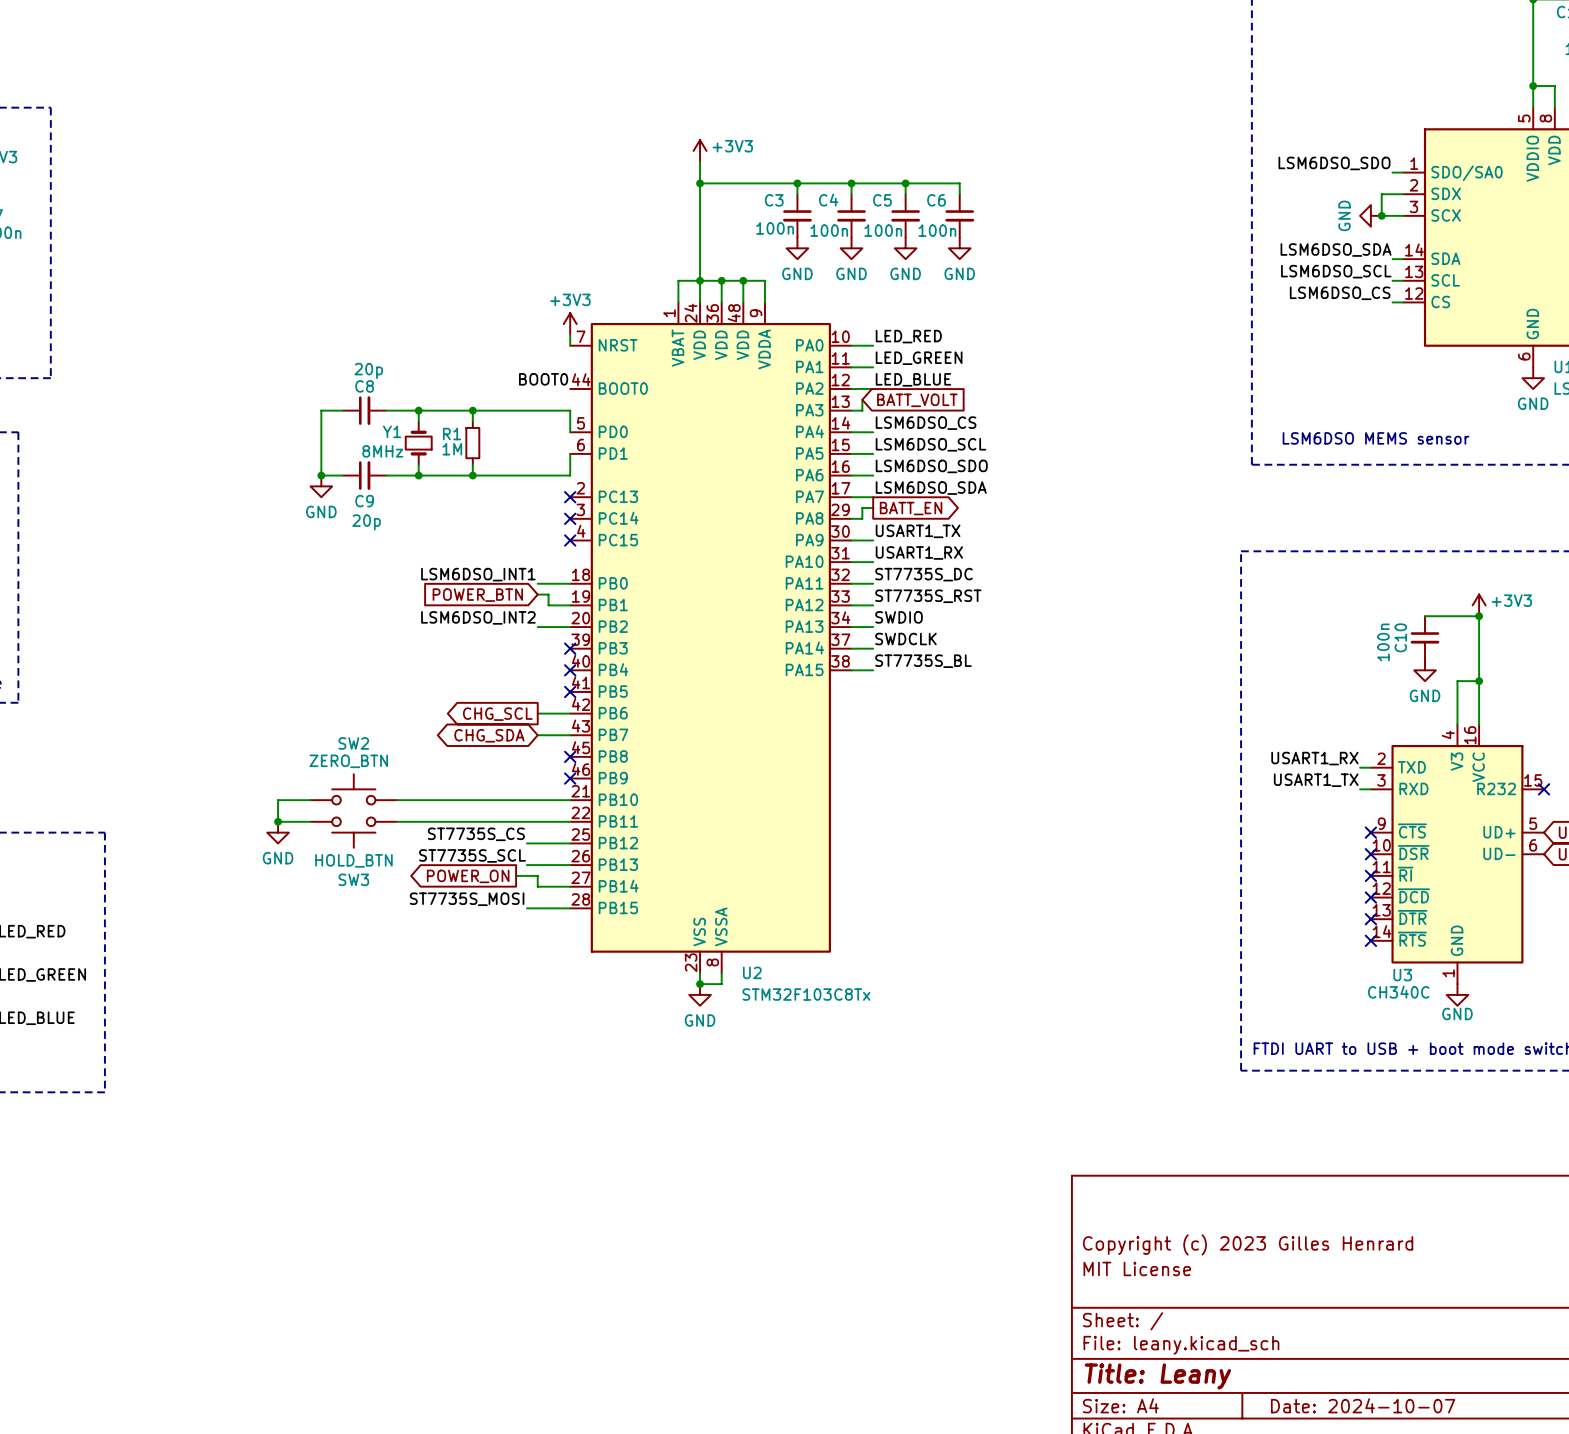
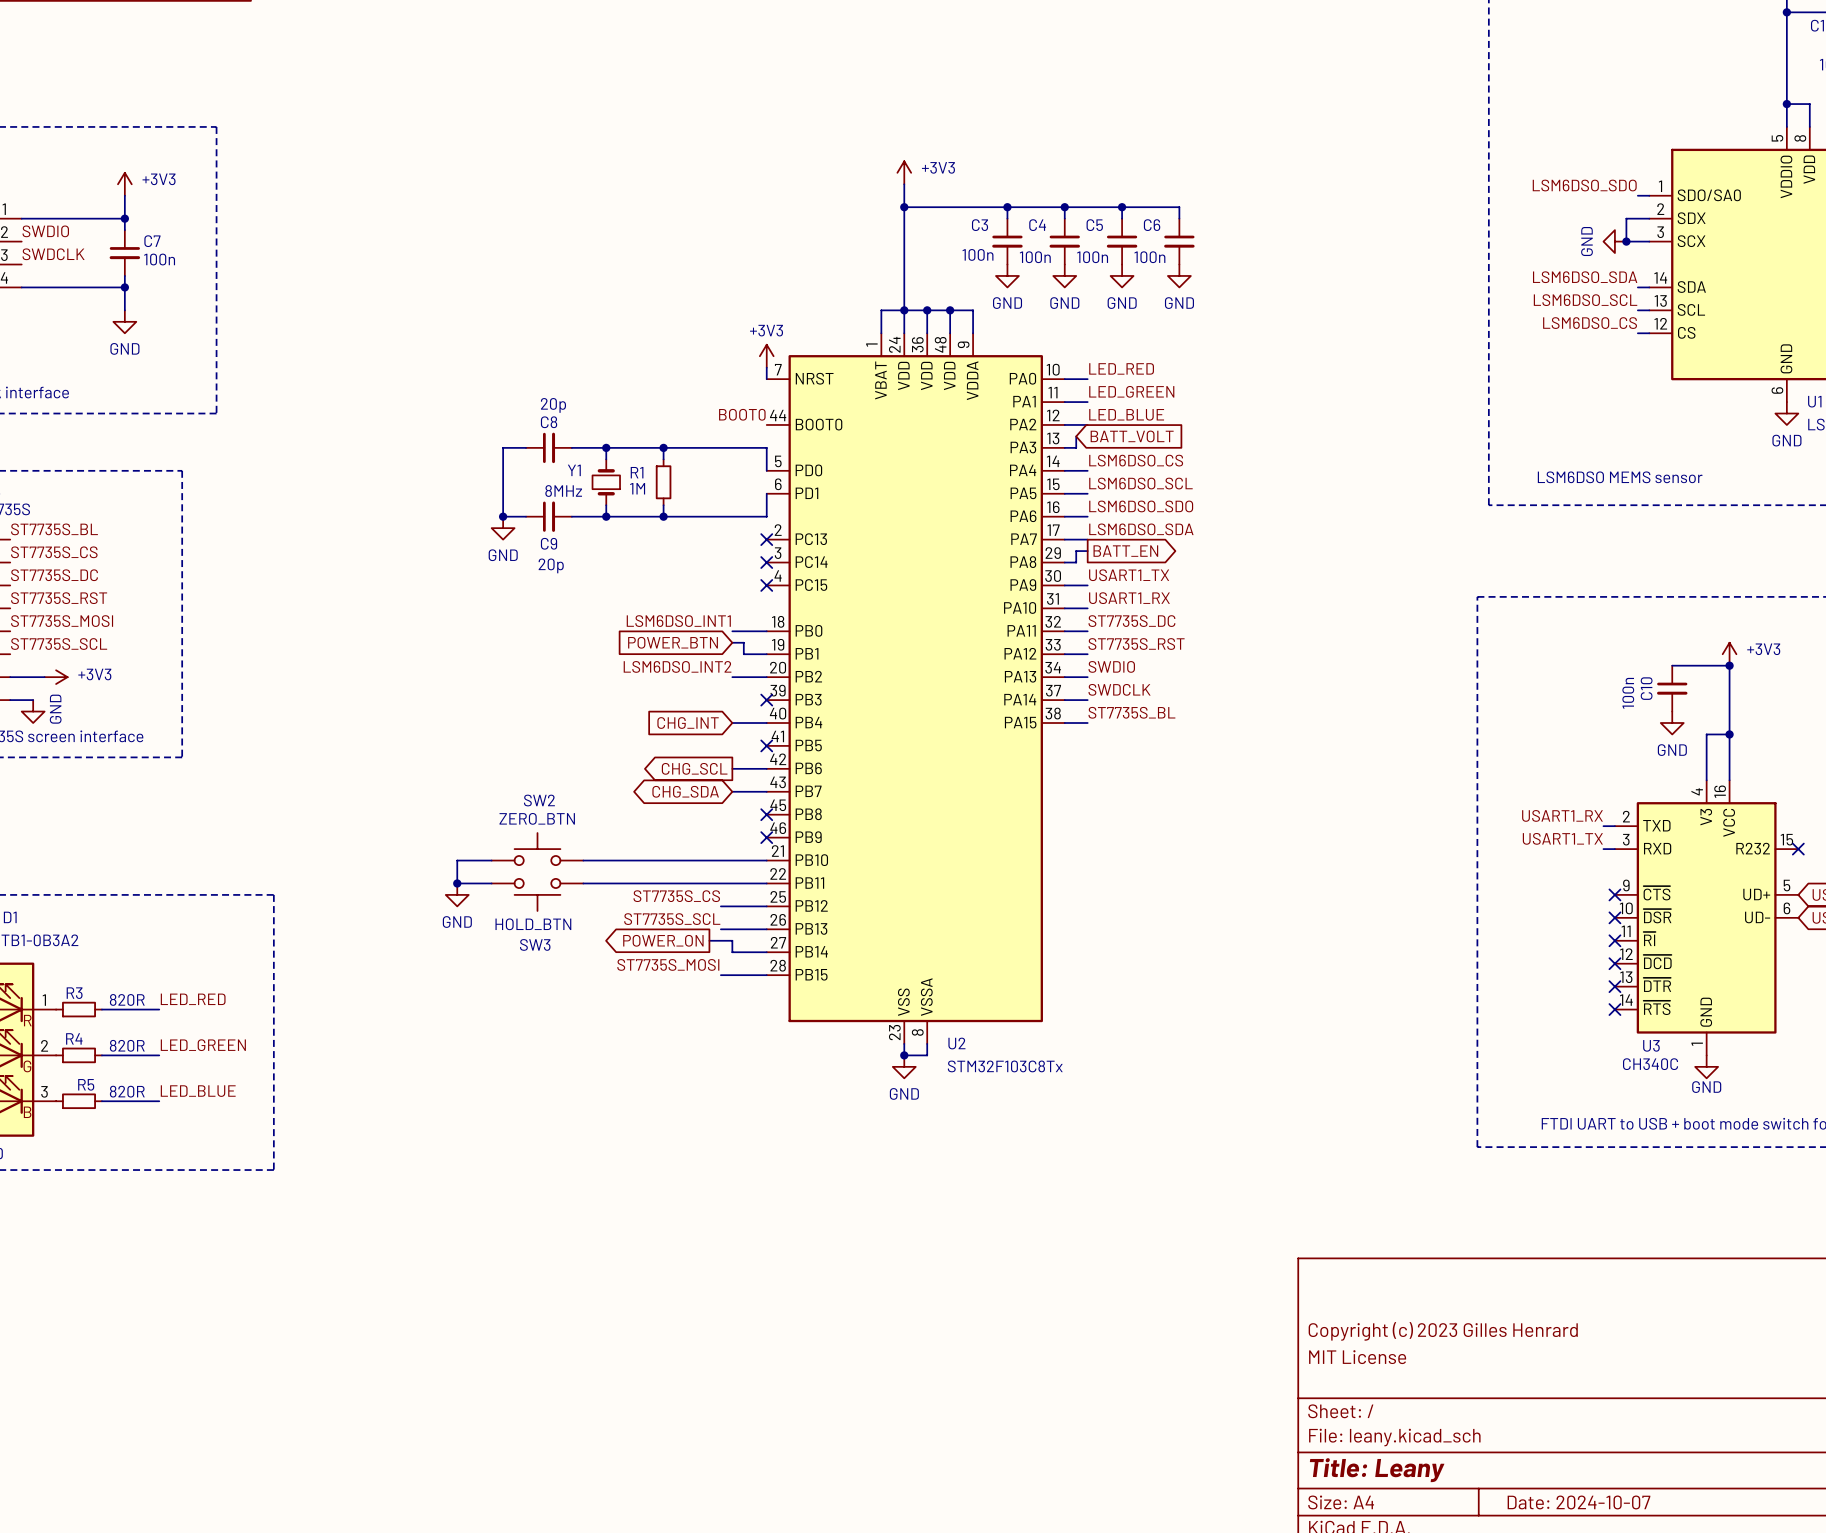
global label: none -> CHG_INT (688, 723)
wire: none -> (732, 723) (766, 723)
no-connect mark: (570, 670) -> none

